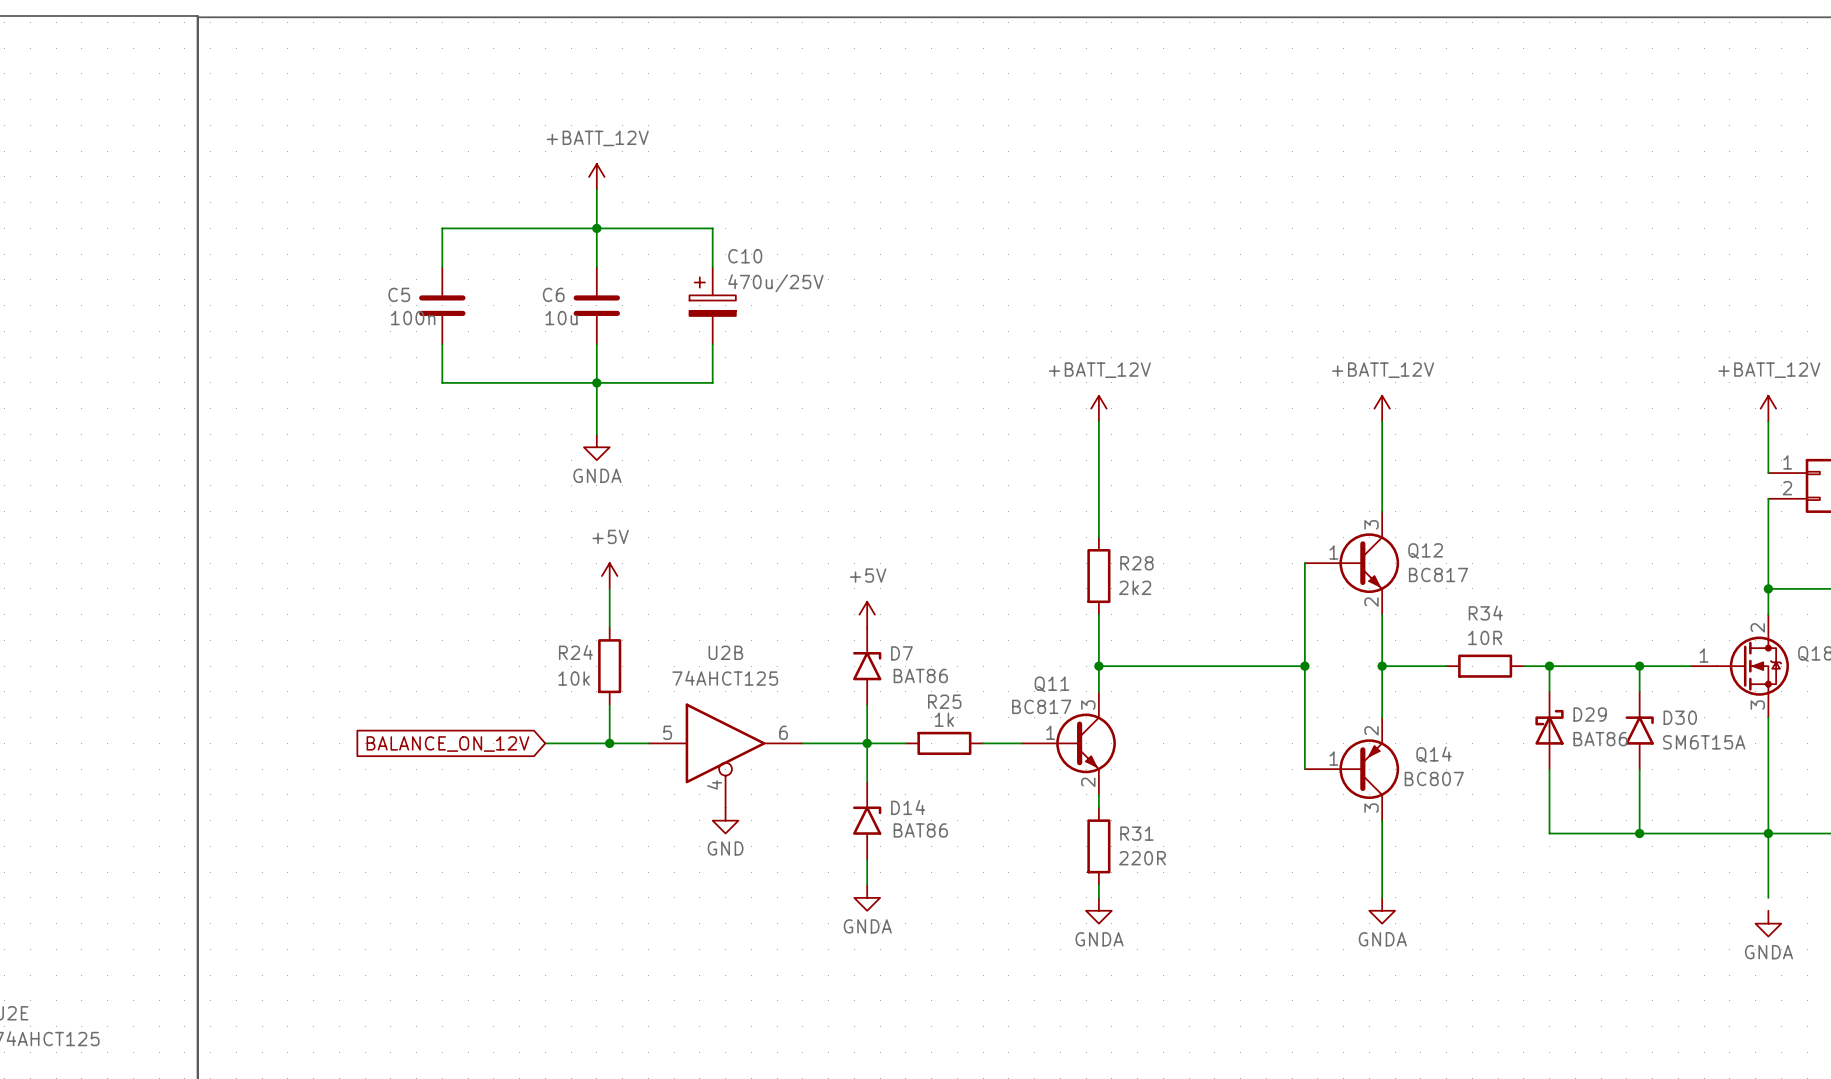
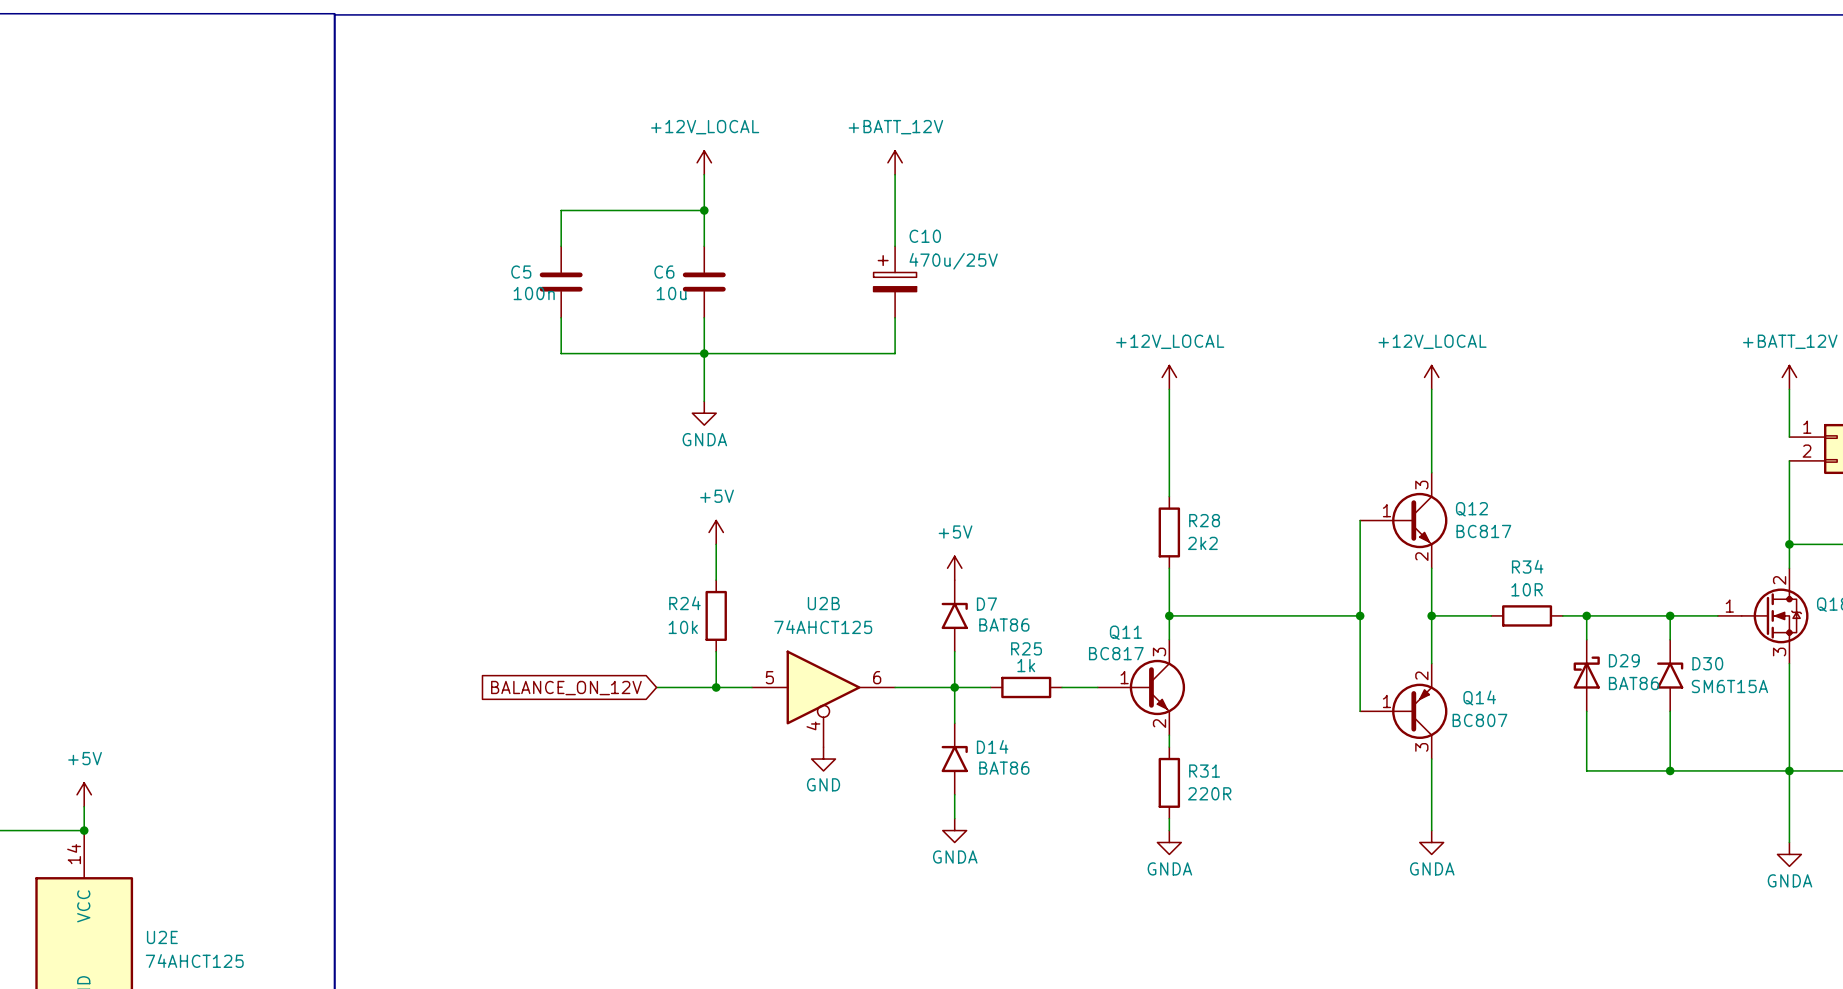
power symbol: +BATT_12V (596, 176) -> +12V_LOCAL (704, 162)
power symbol: none -> +BATT_12V (895, 162)
wire: none -> (895, 174) (895, 246)
wire: (596, 228) (712, 228) (712, 267) -> none
C10 position: (712, 305) -> (895, 282)
wire: (712, 344) (712, 382) -> (895, 317) (895, 353) (811, 353)
power symbol: +BATT_12V (1098, 408) -> +12V_LOCAL (1169, 377)
power symbol: +BATT_12V (1382, 408) -> +12V_LOCAL (1431, 377)
wire: none -> (1789, 830) (1789, 842)

